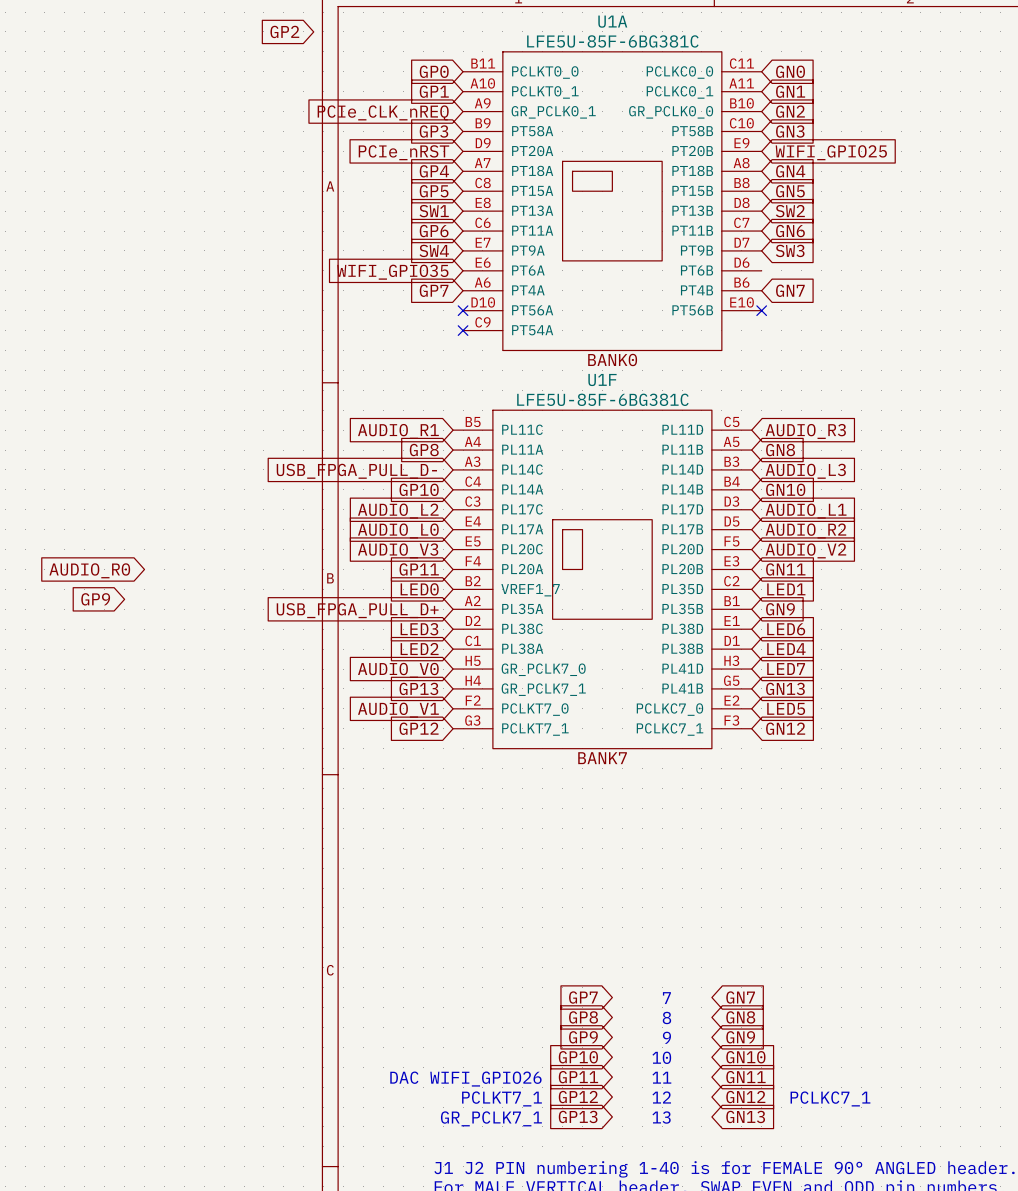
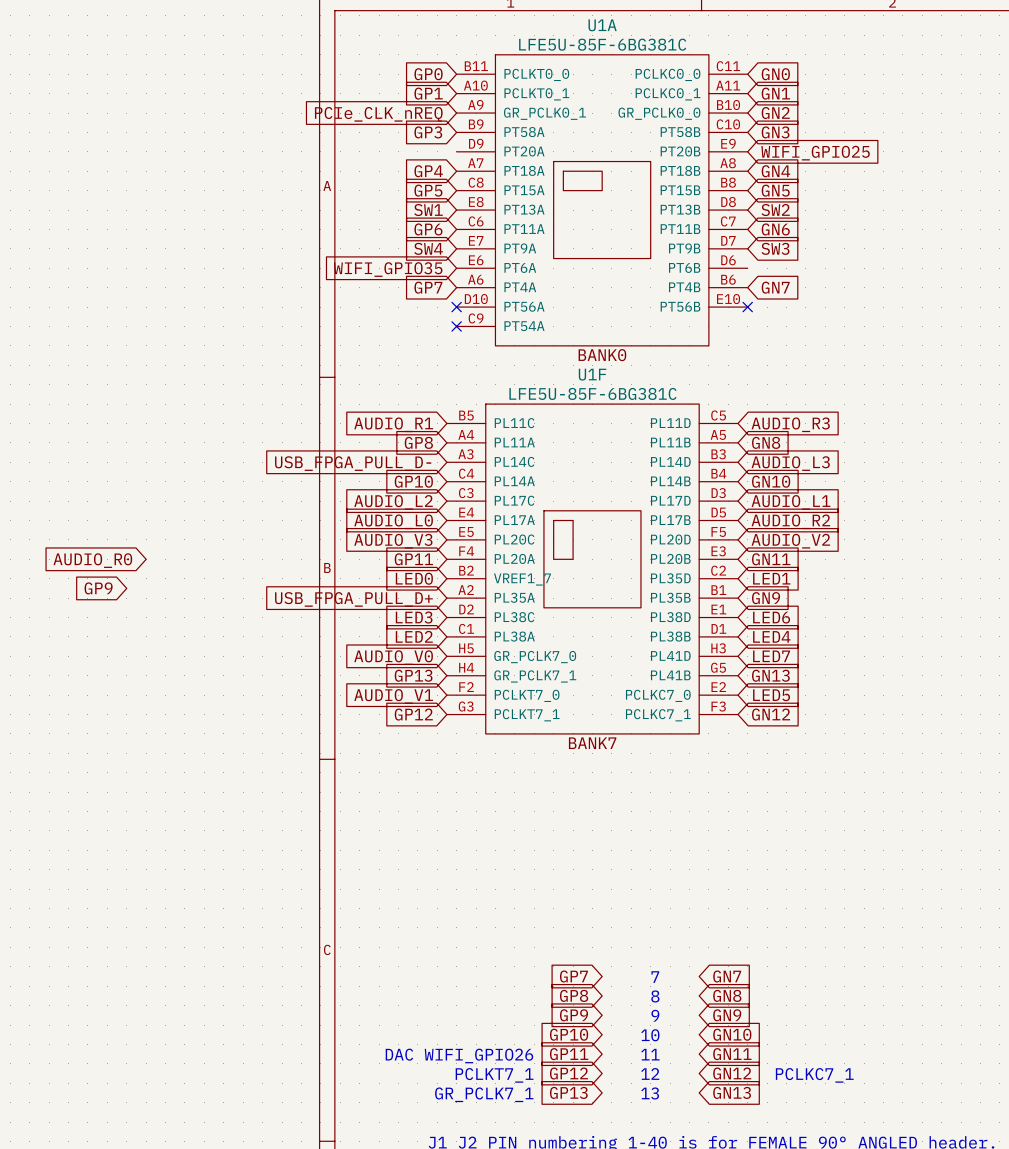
global label: GP2 (284, 31) -> none
global label: PCIe_nRST (403, 152) -> none

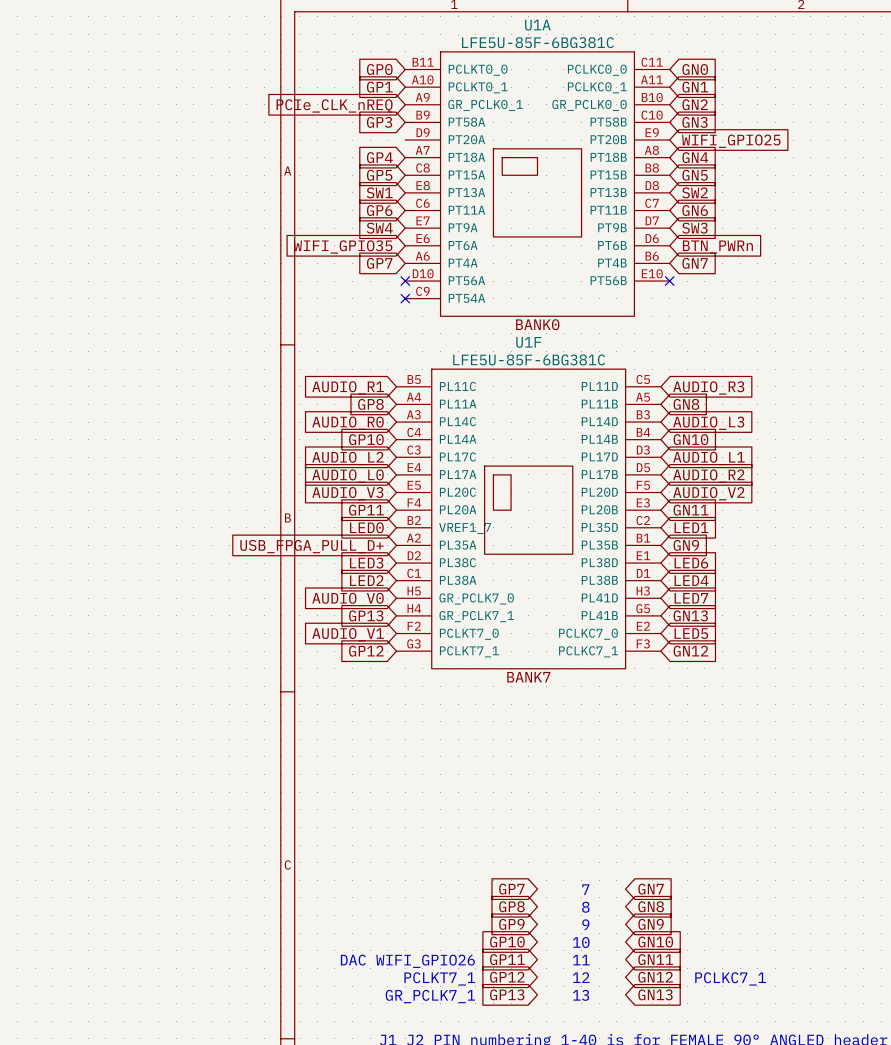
global label: none -> BTN_PWRn (717, 247)
global label: USB_FPGA_PULL_D- (353, 463) -> AUDIO_R0 (348, 423)
global label: AUDIO_R0 (92, 560) -> none
global label: GP9 (98, 588) -> none

